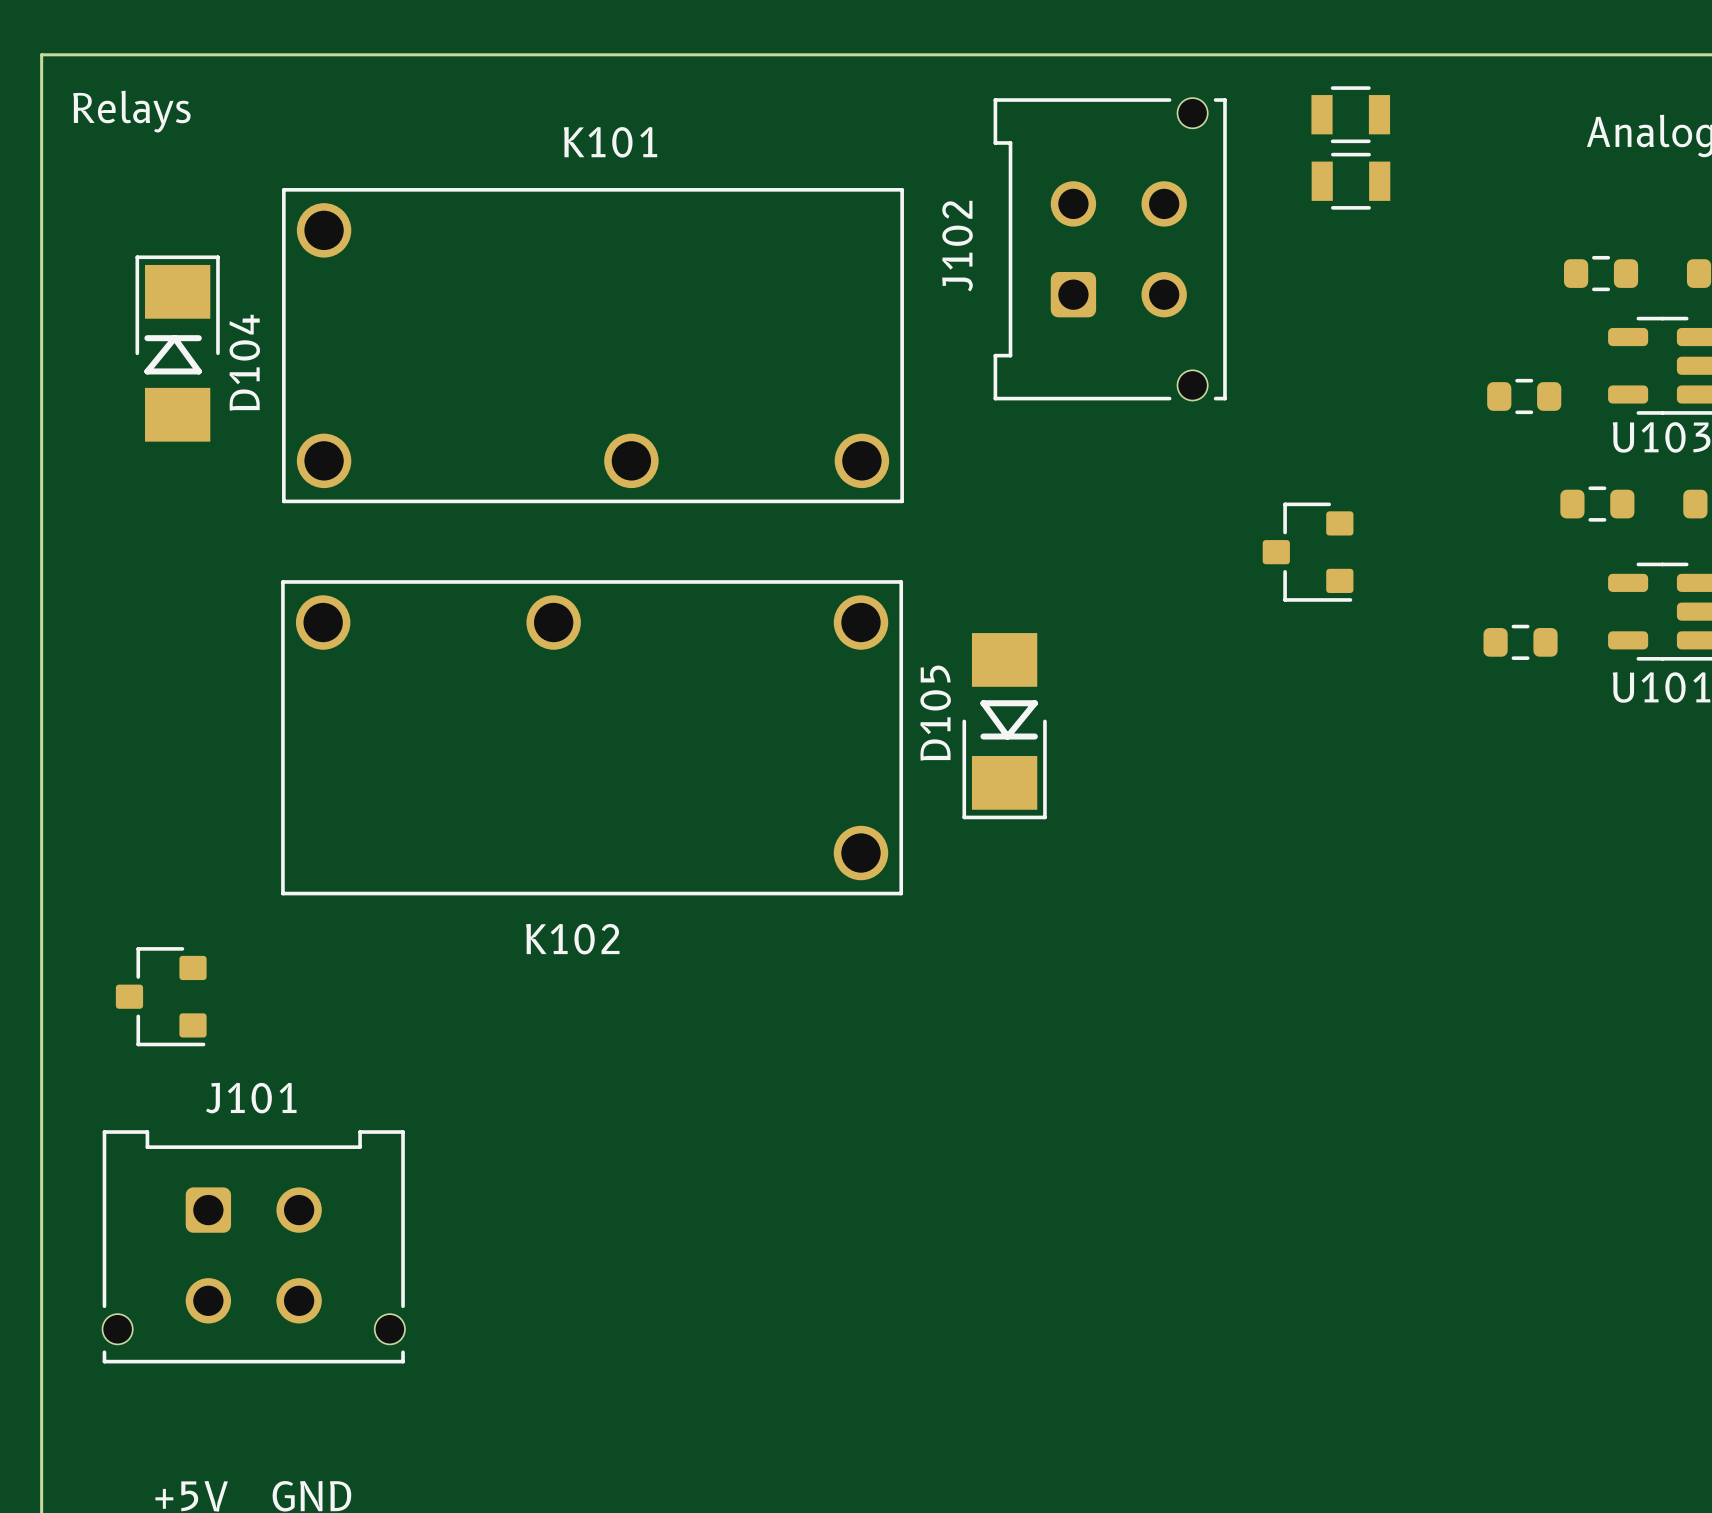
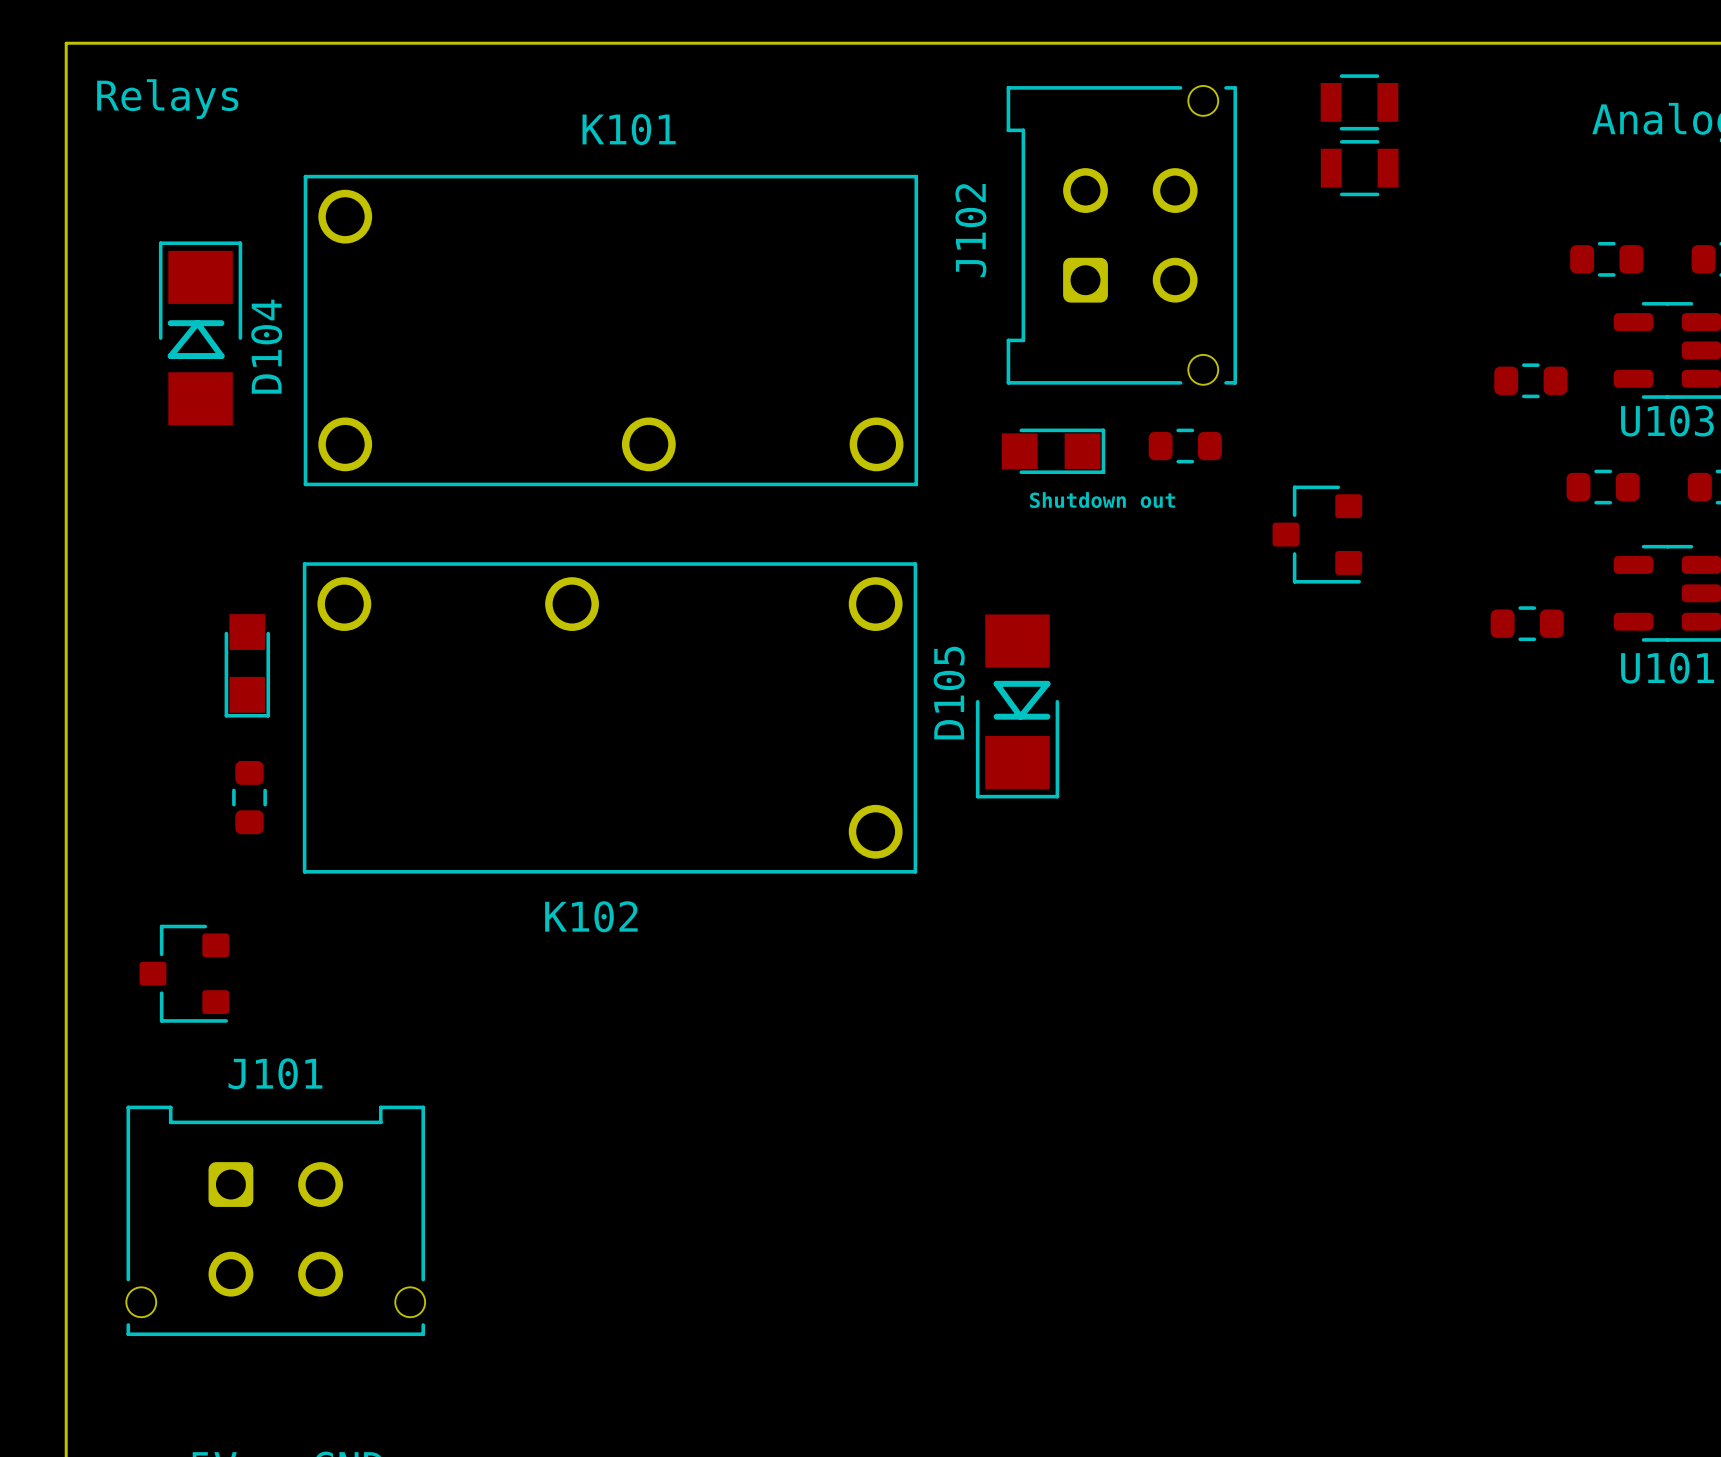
part: none -> (1185, 446)
part: none -> (1053, 451)
text: none -> Shutdown out (1102, 500)
part: none -> (247, 665)
part: none -> (249, 797)

